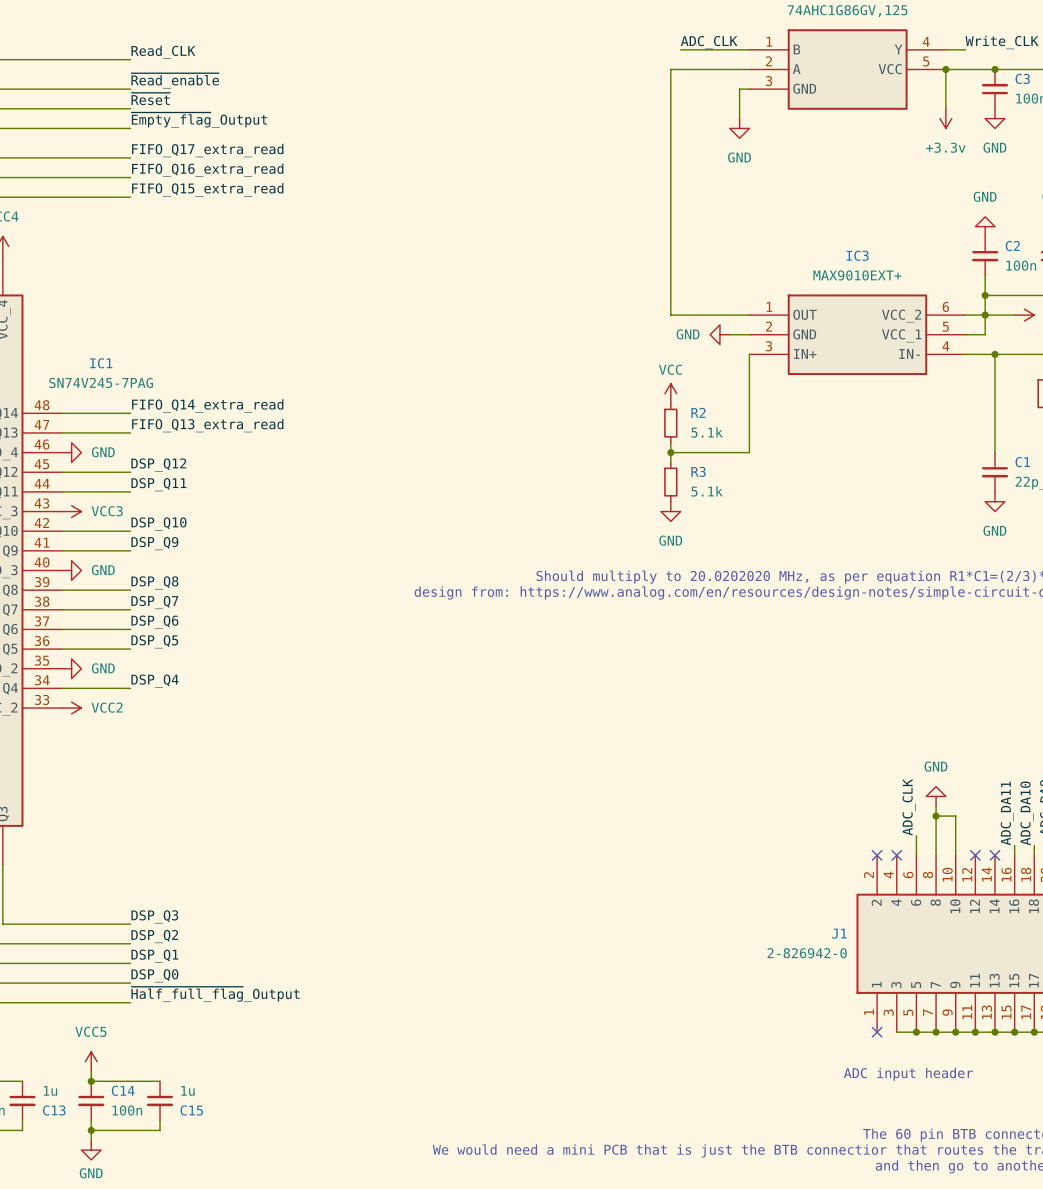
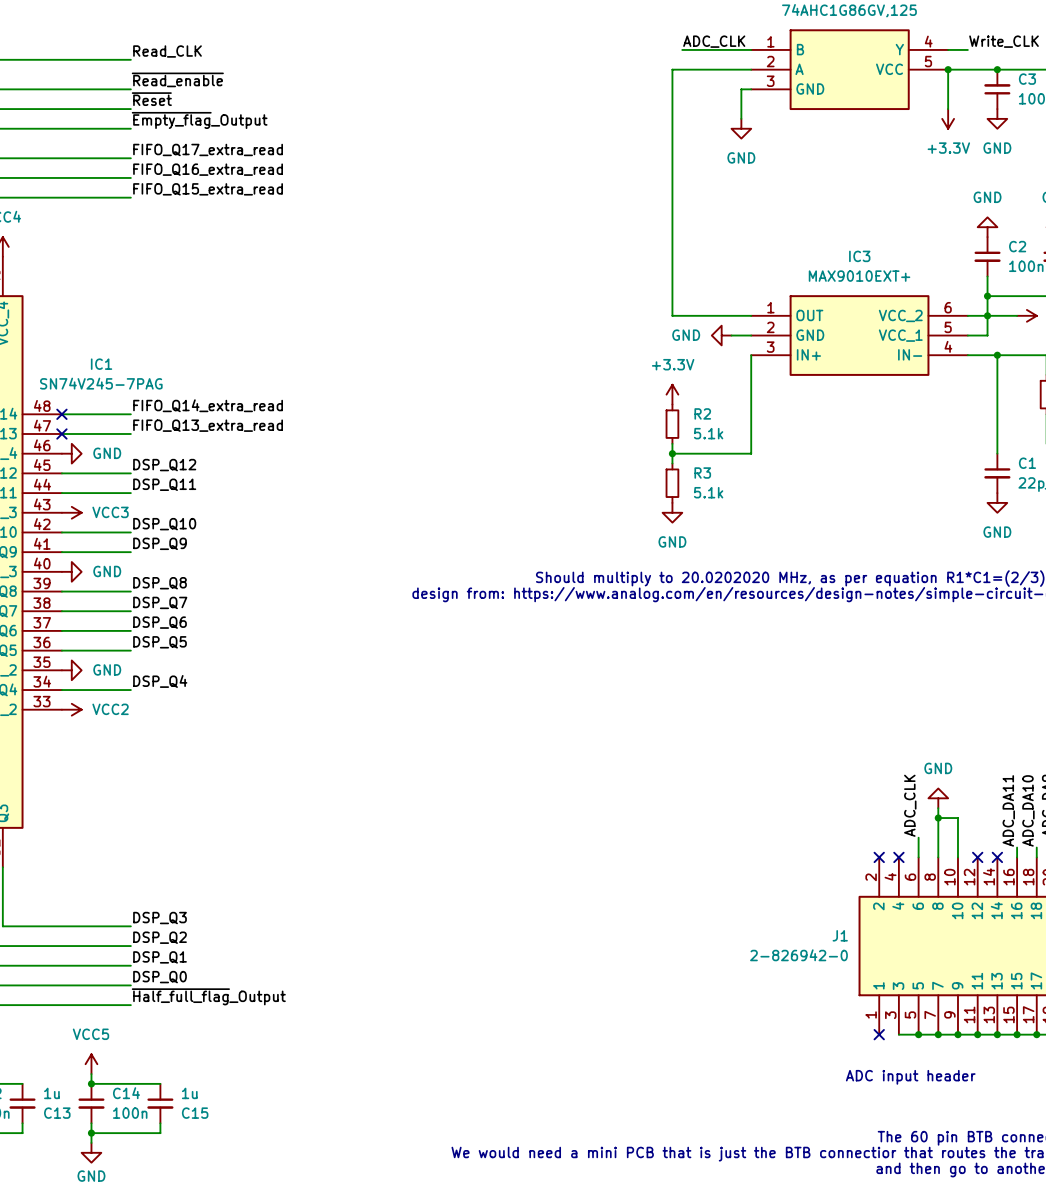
power symbol: +3.3v (945, 118) -> +3.3V (948, 118)
power symbol: VCC (670, 393) -> +3.3V (672, 394)
no-connect mark: none -> (61, 414)
no-connect mark: none -> (61, 434)

